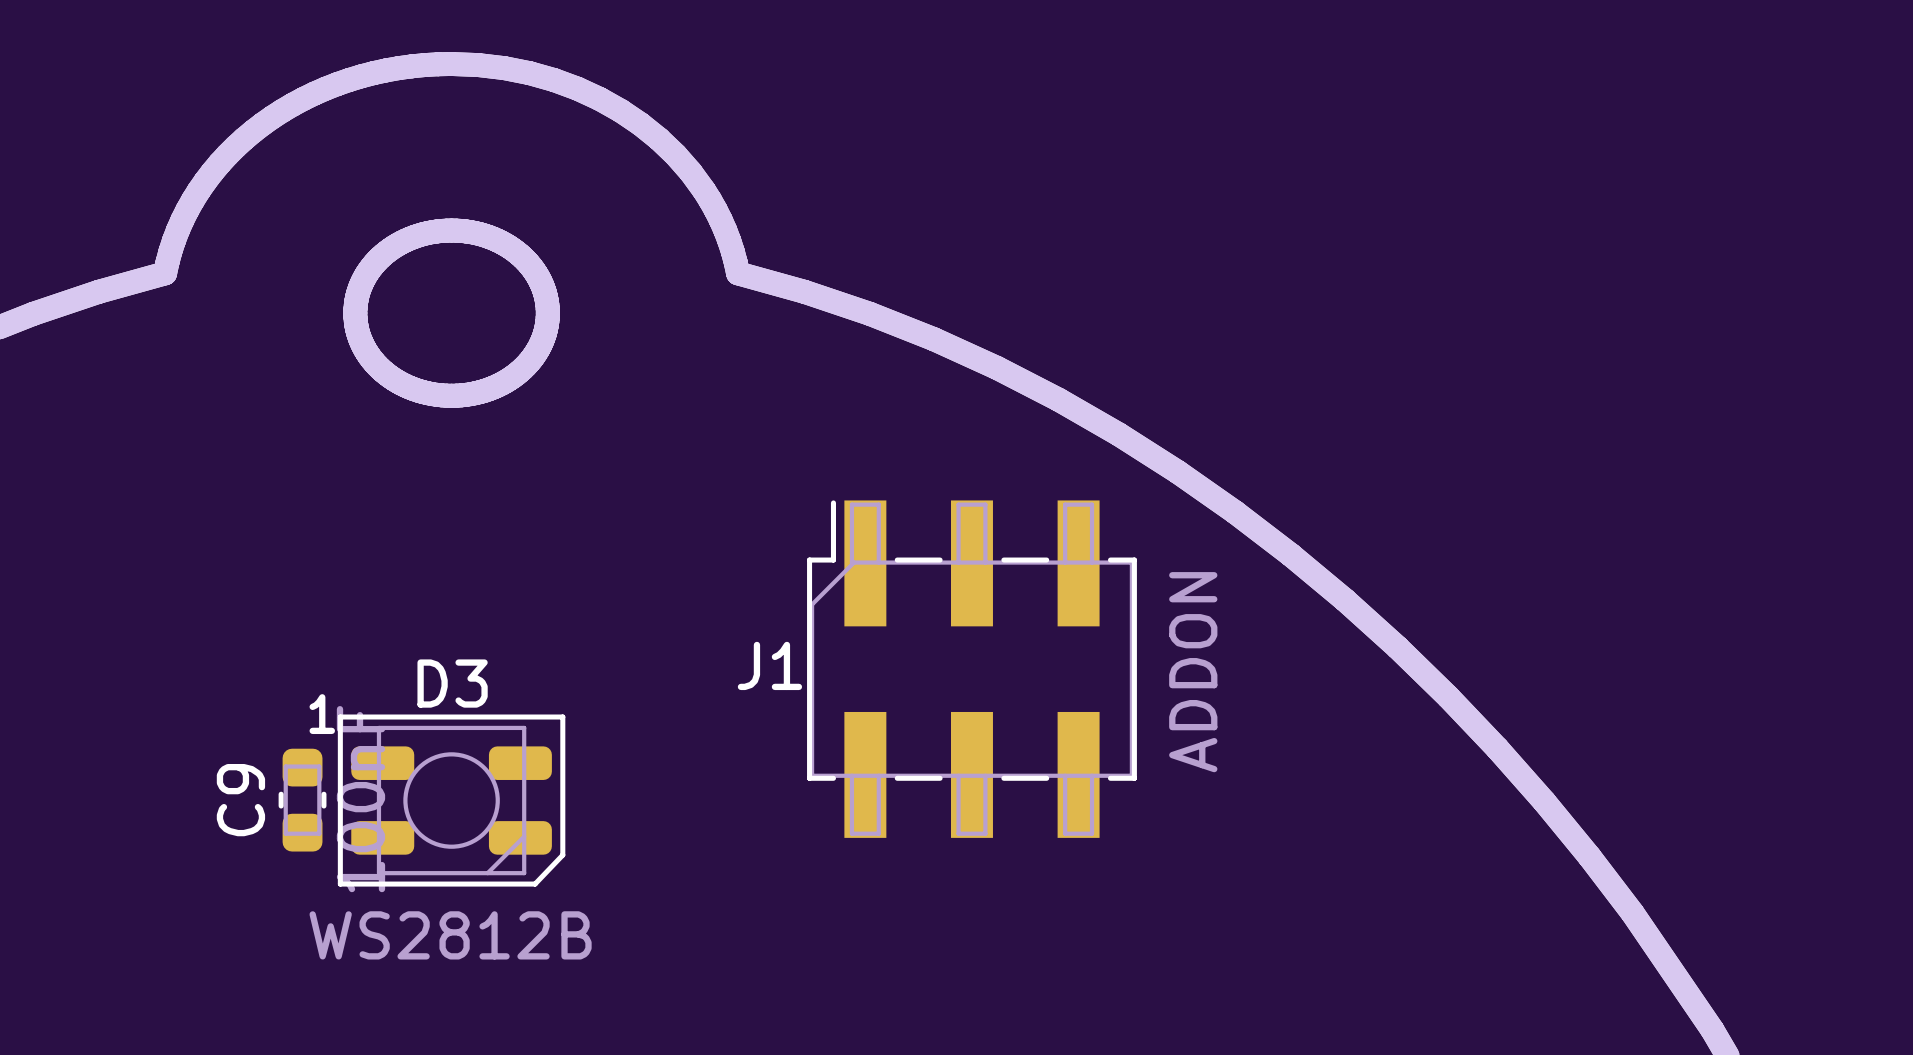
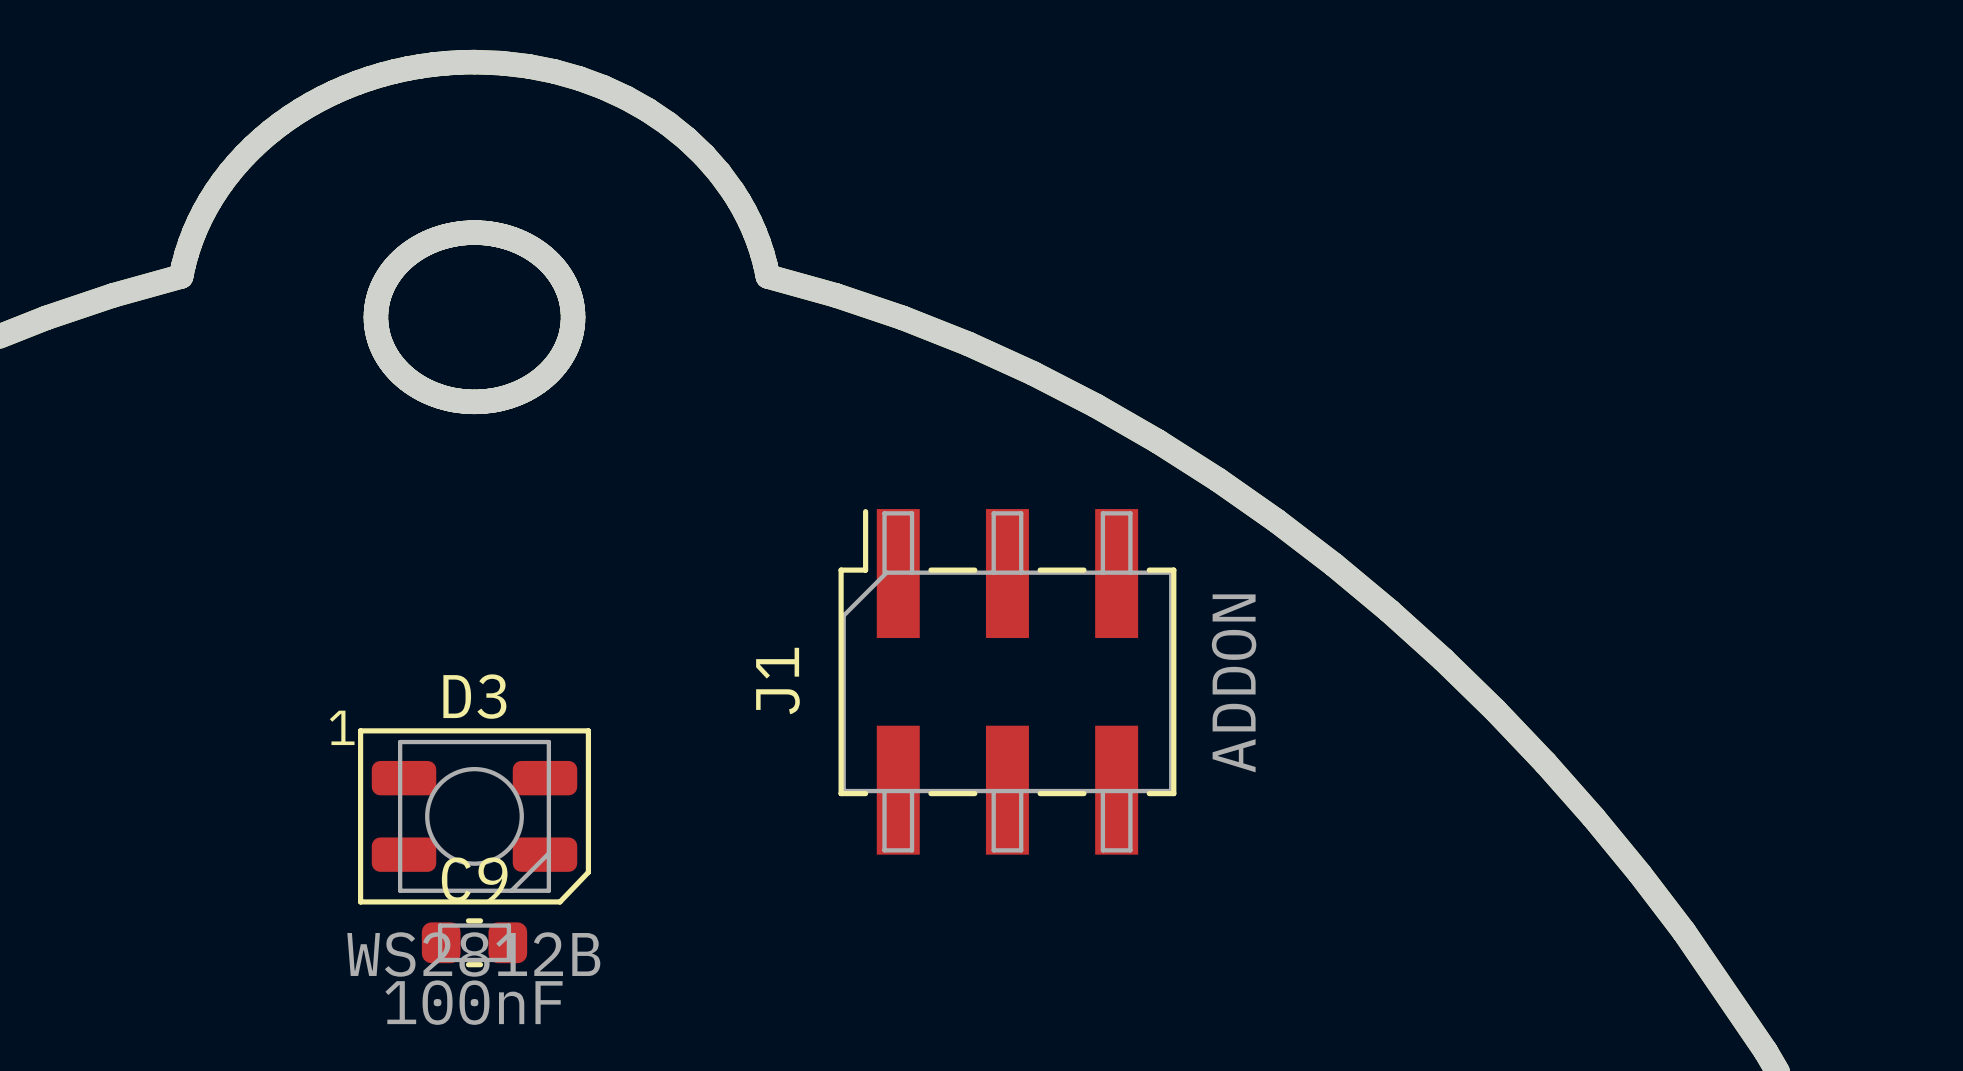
J1 name rotation: 0° (769, 665) -> 90° counterclockwise (777, 681)
C9 rotation: 0° (302, 800) -> 90° clockwise (474, 942)
C9 position: (302, 800) -> (474, 942)

